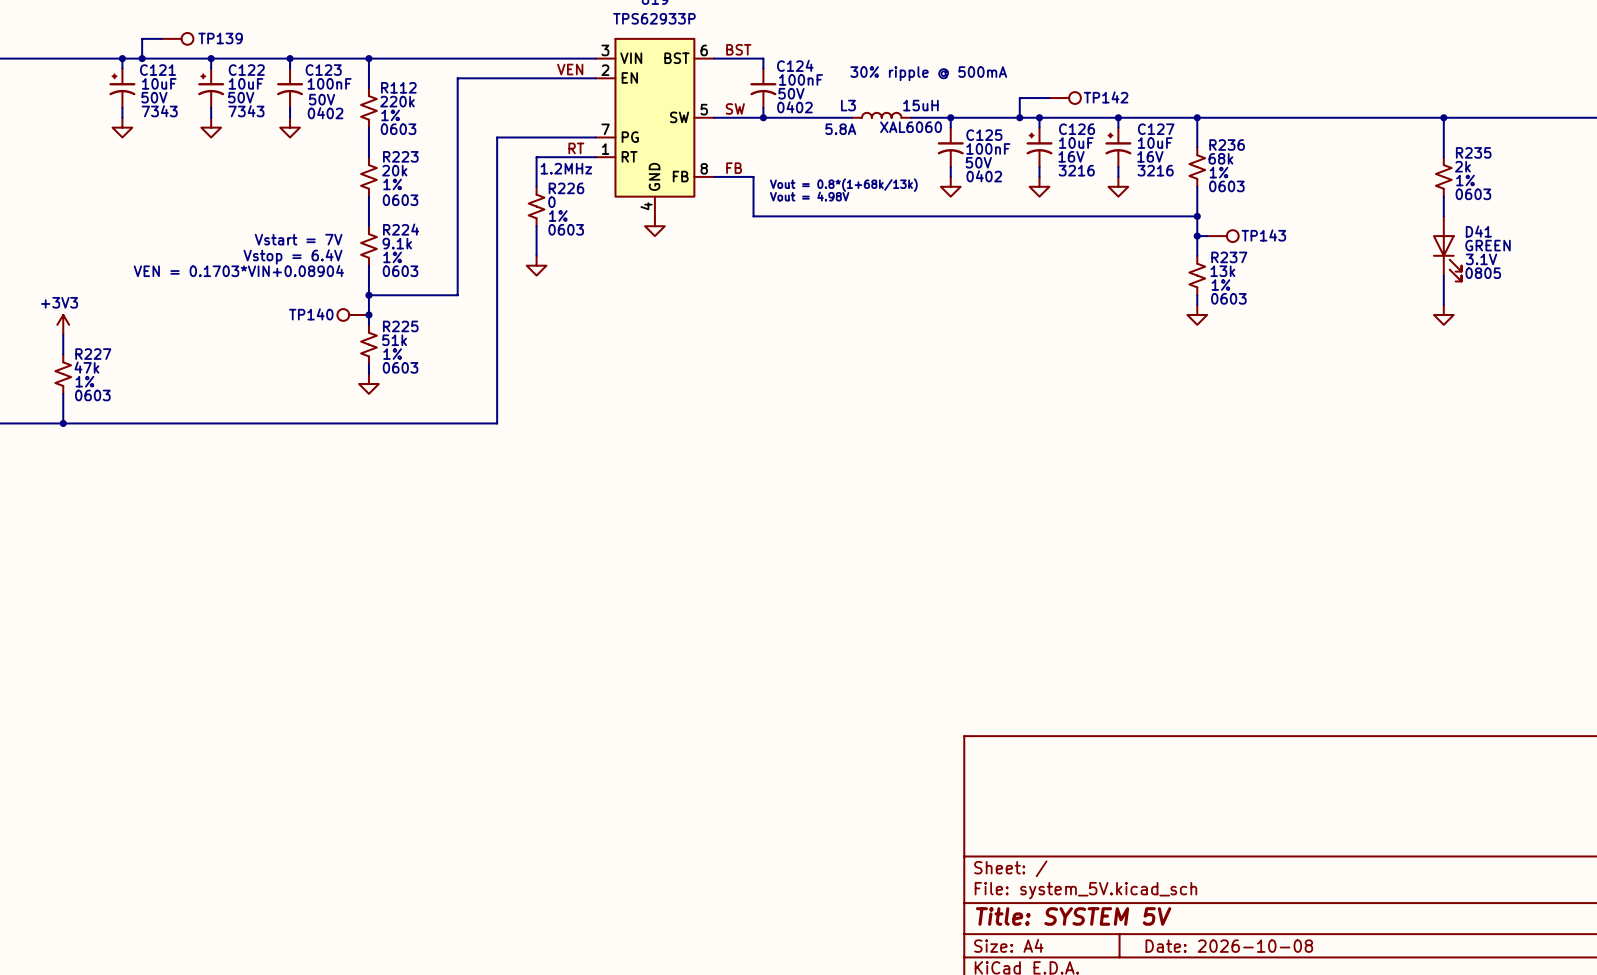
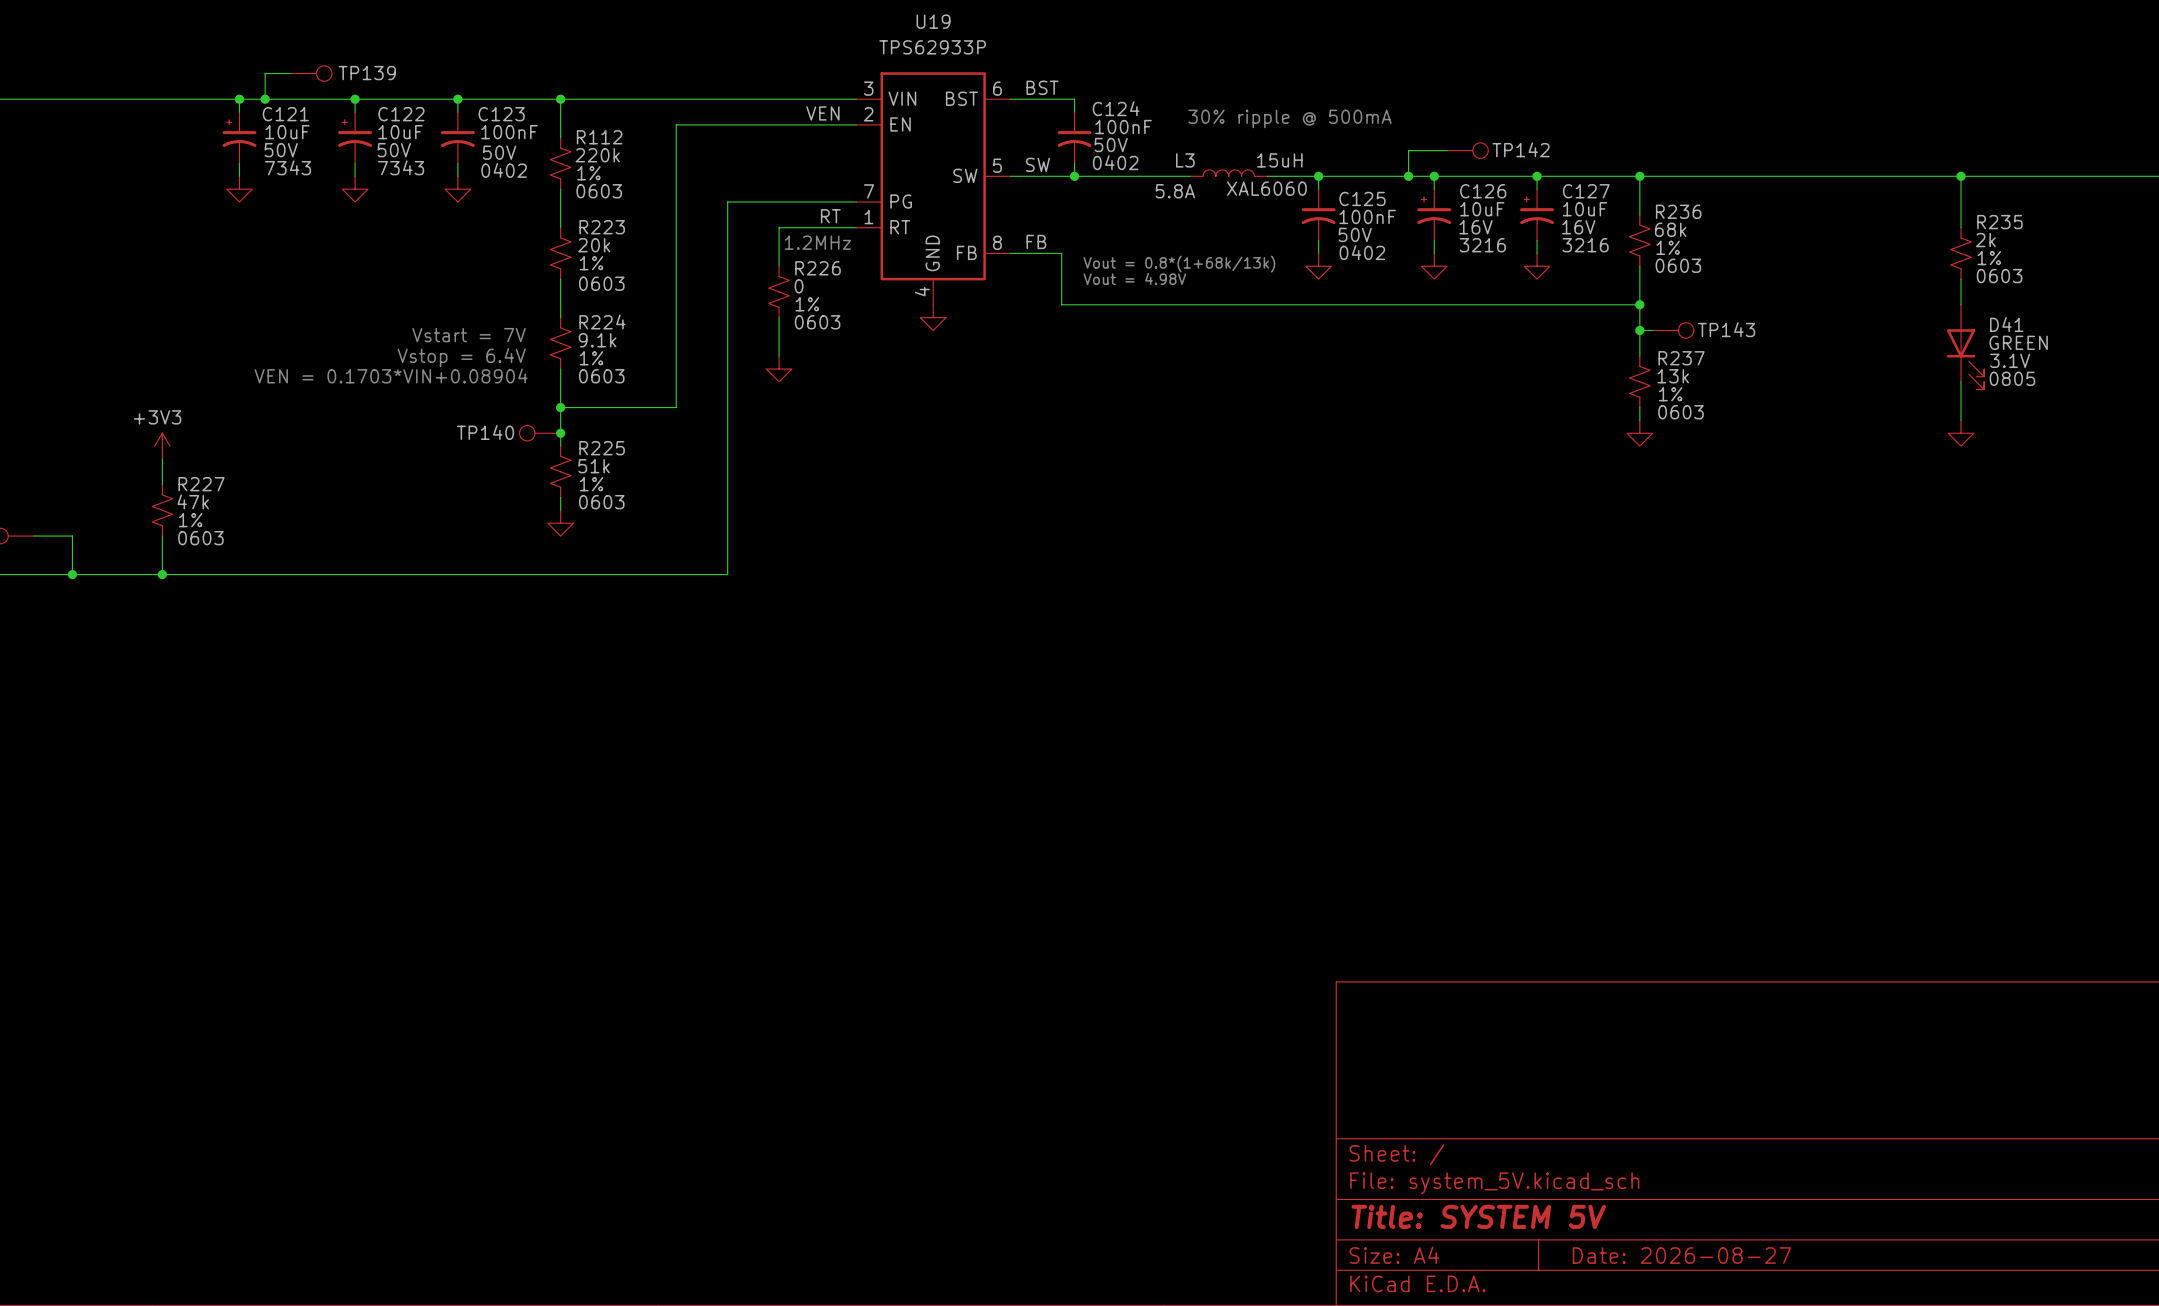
title block: Date: 2026-10-08 (1229, 946) -> Date: 2026-08-27 (1681, 1255)

